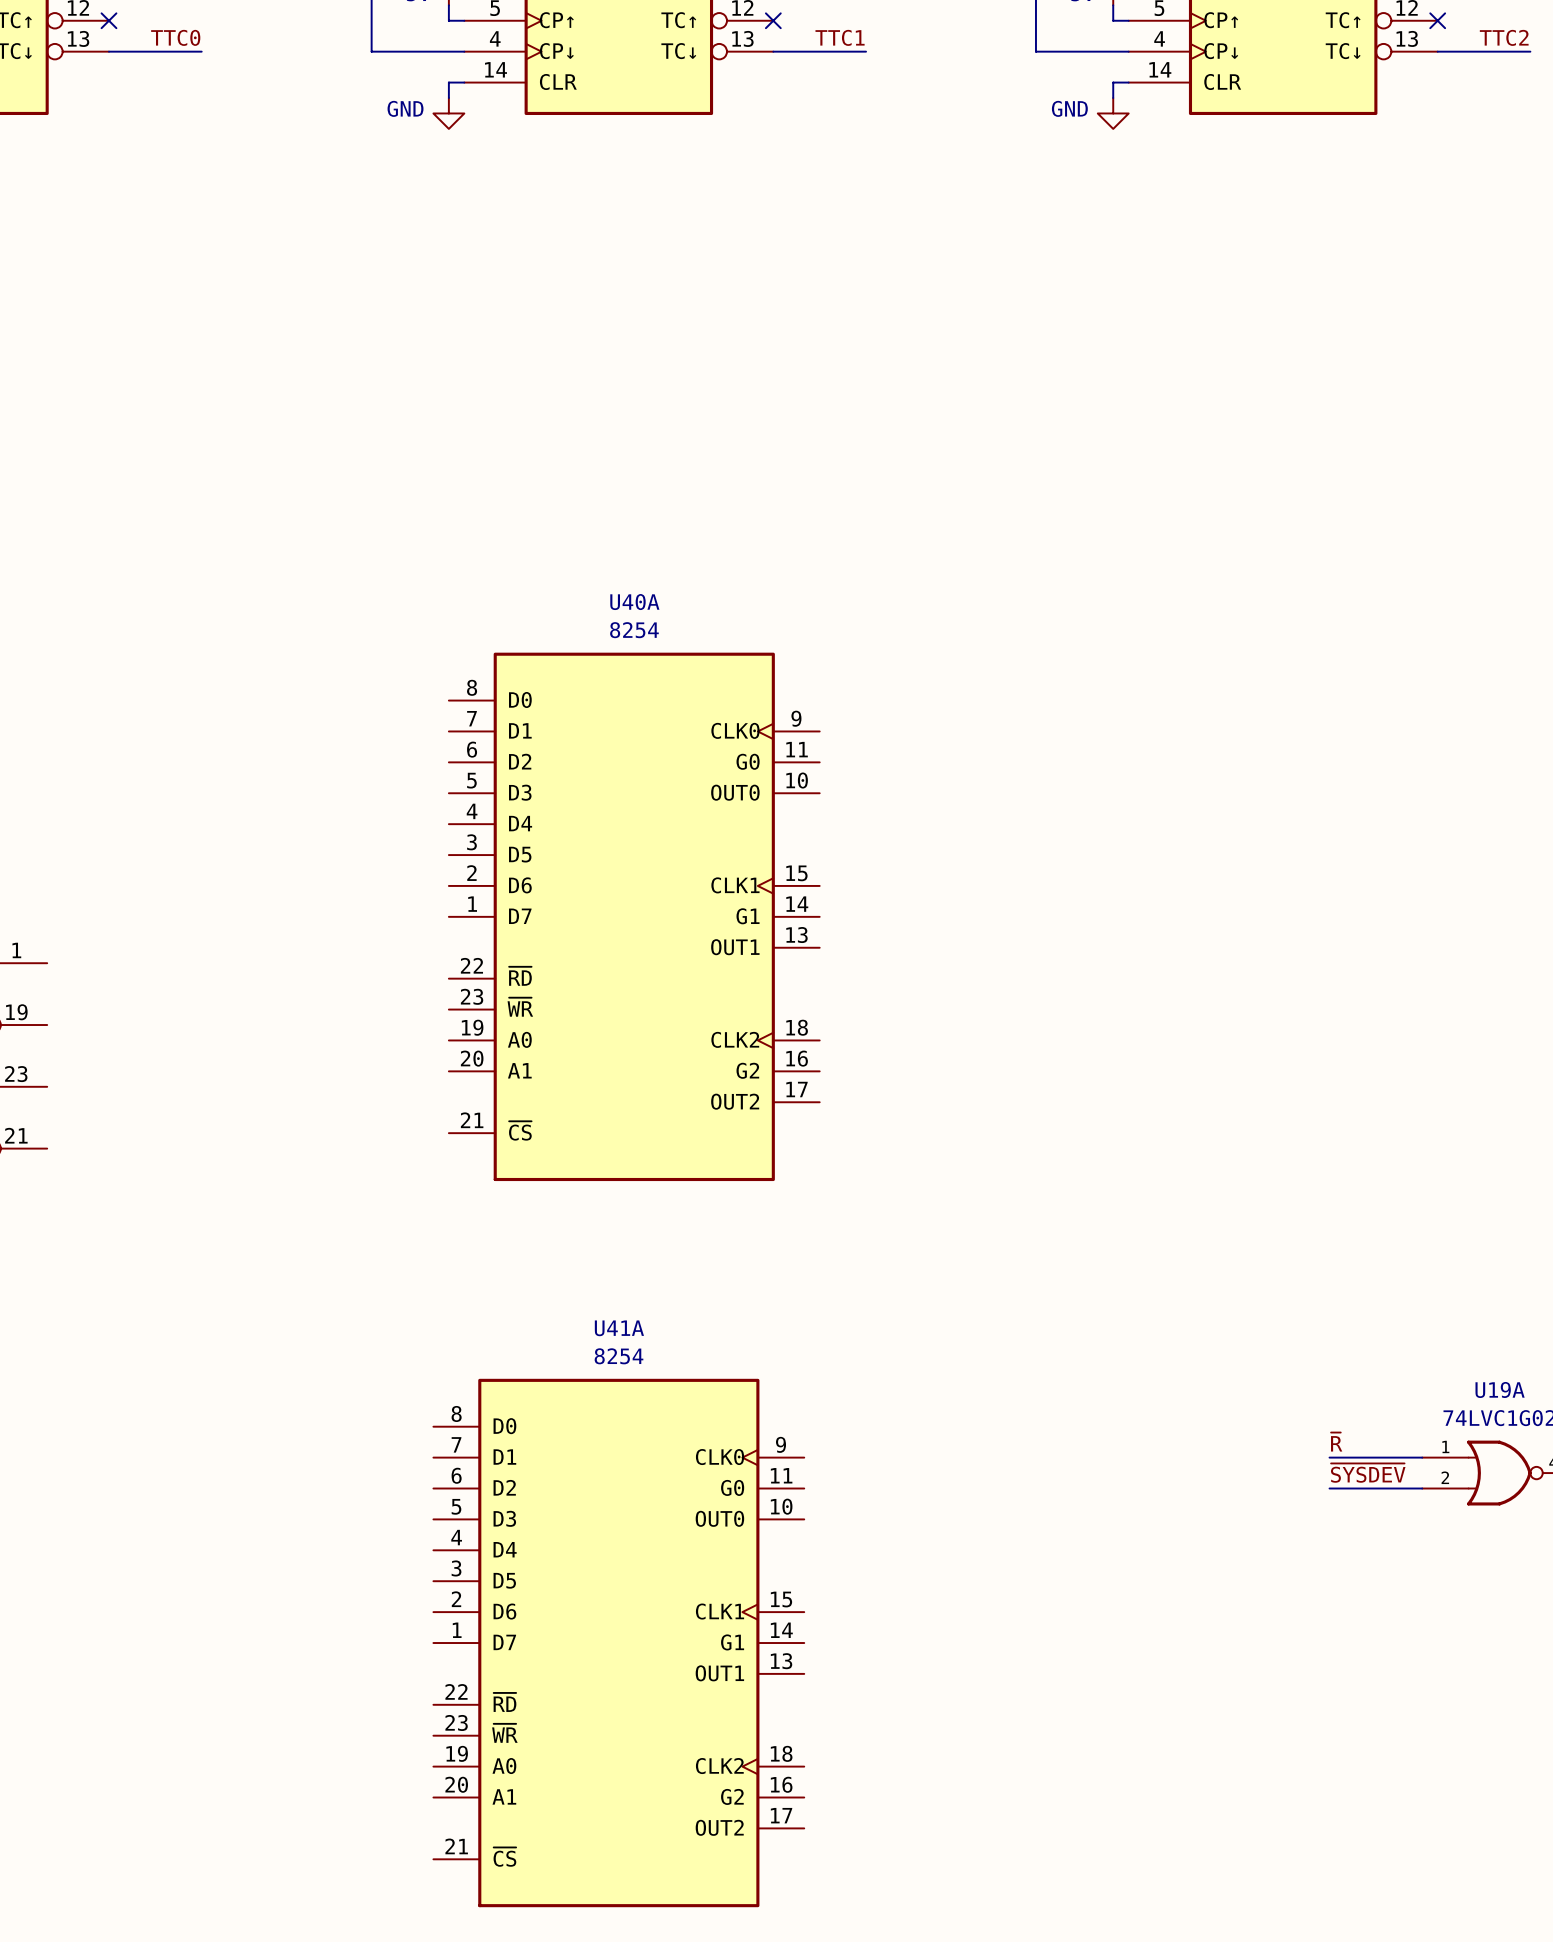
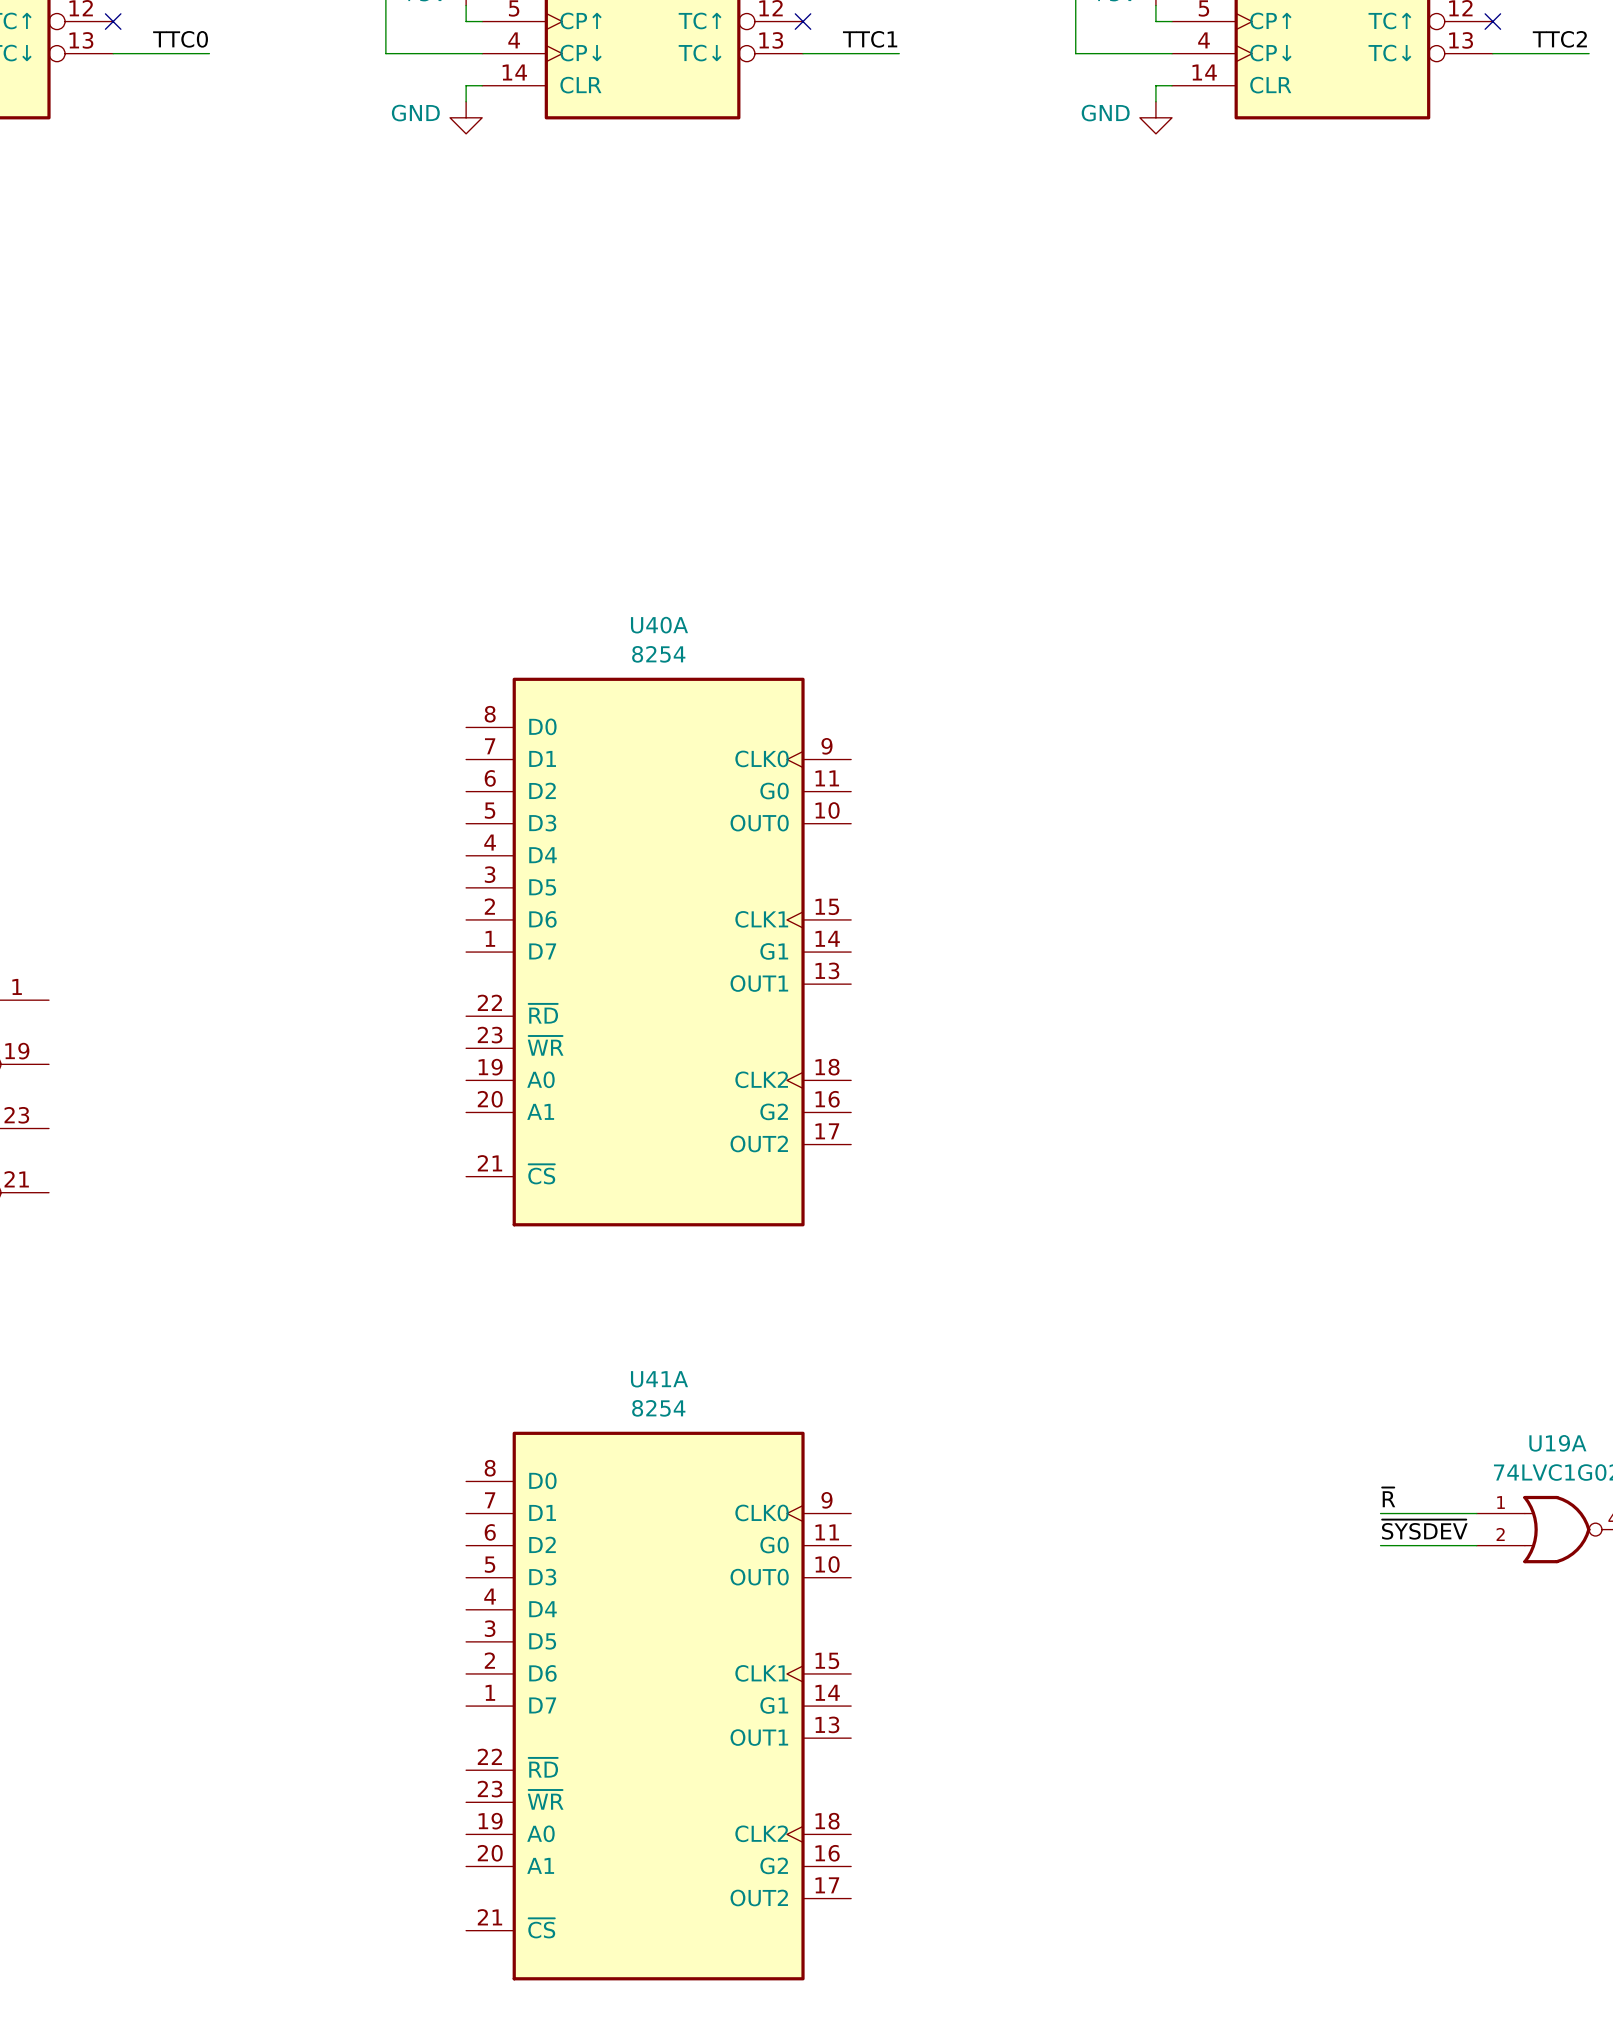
U41A position: (618, 1643) -> (658, 1706)

